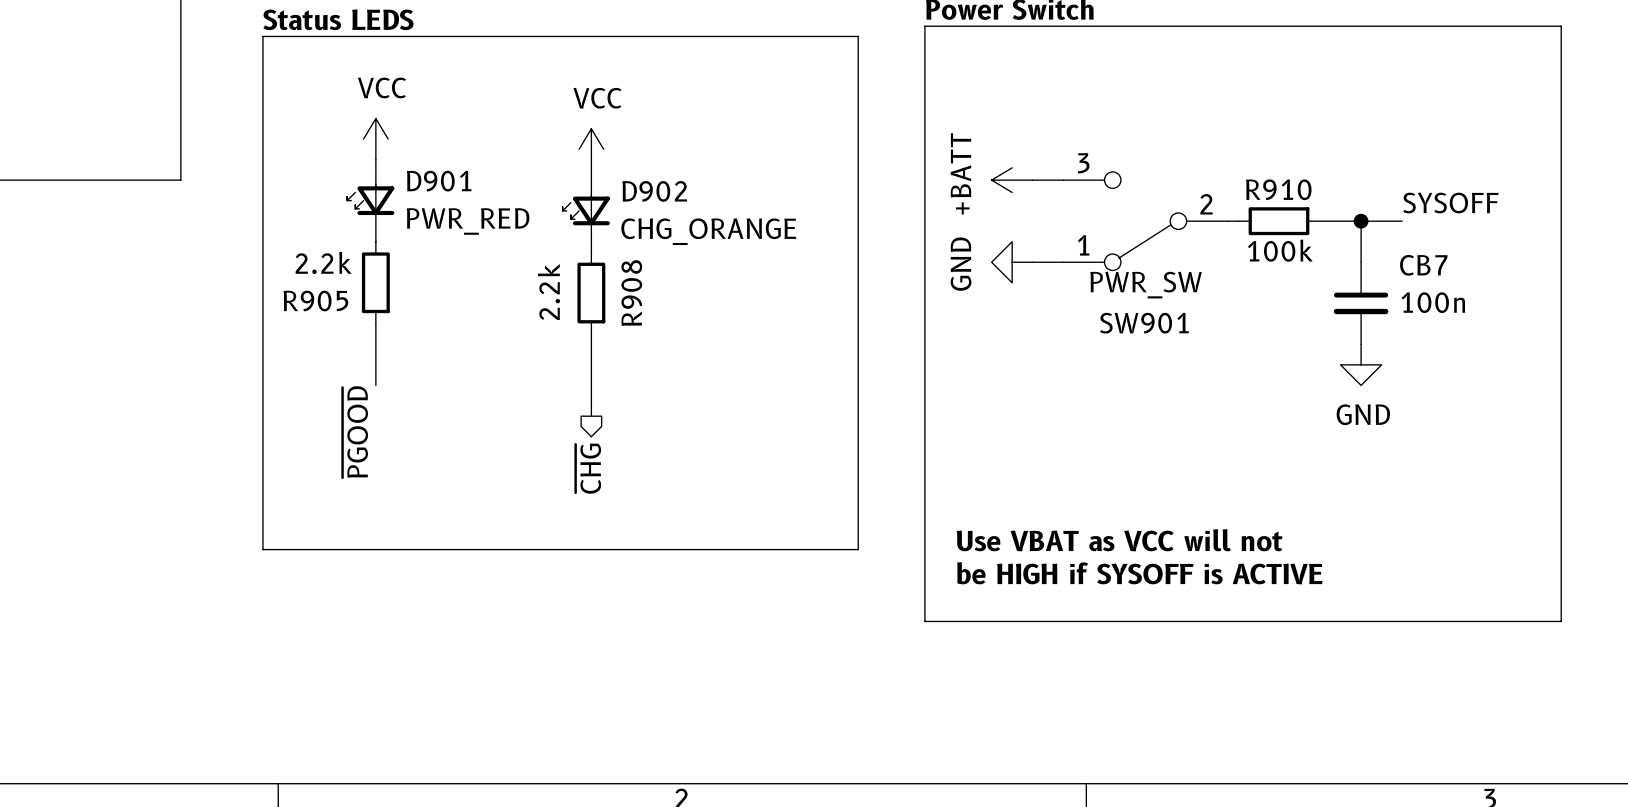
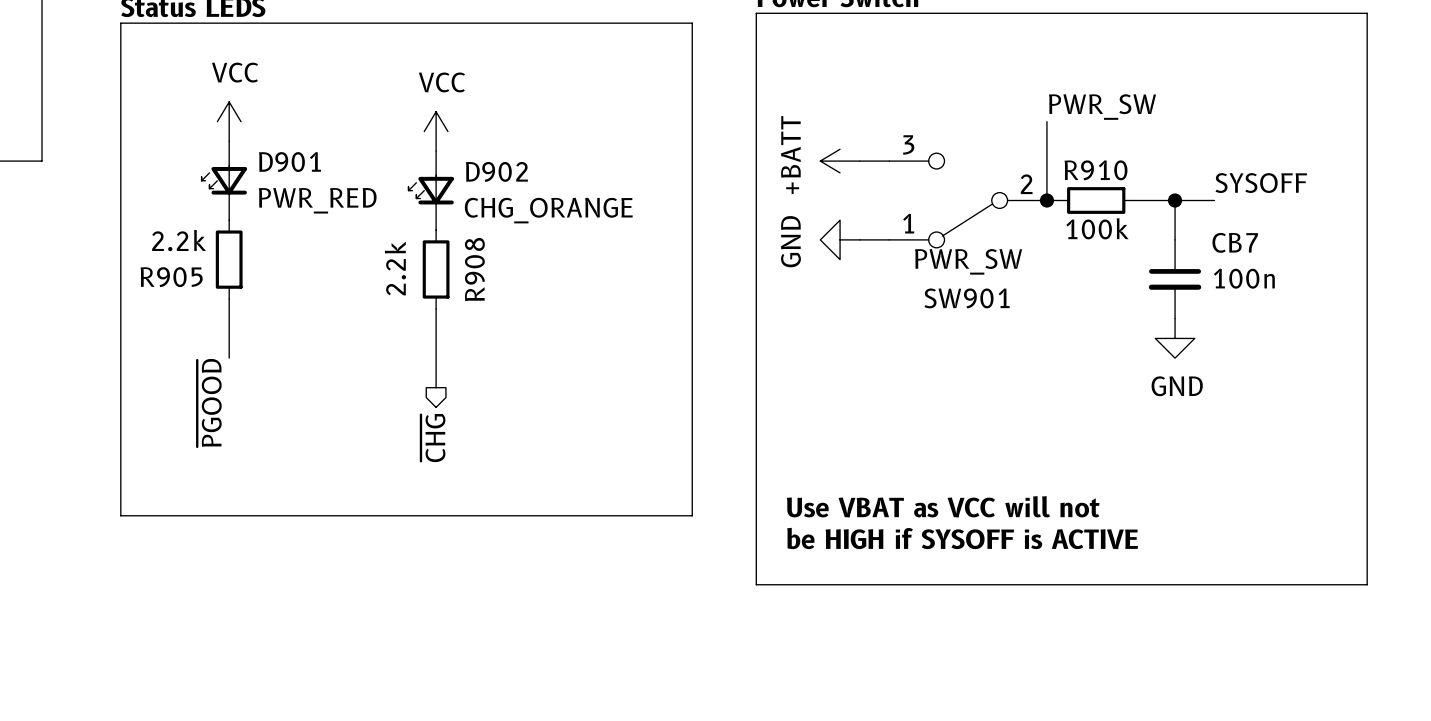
label: none -> PWR_SW (1102, 107)
wire: none -> (1046, 121) (1046, 200)
junction: none -> (1046, 200)

